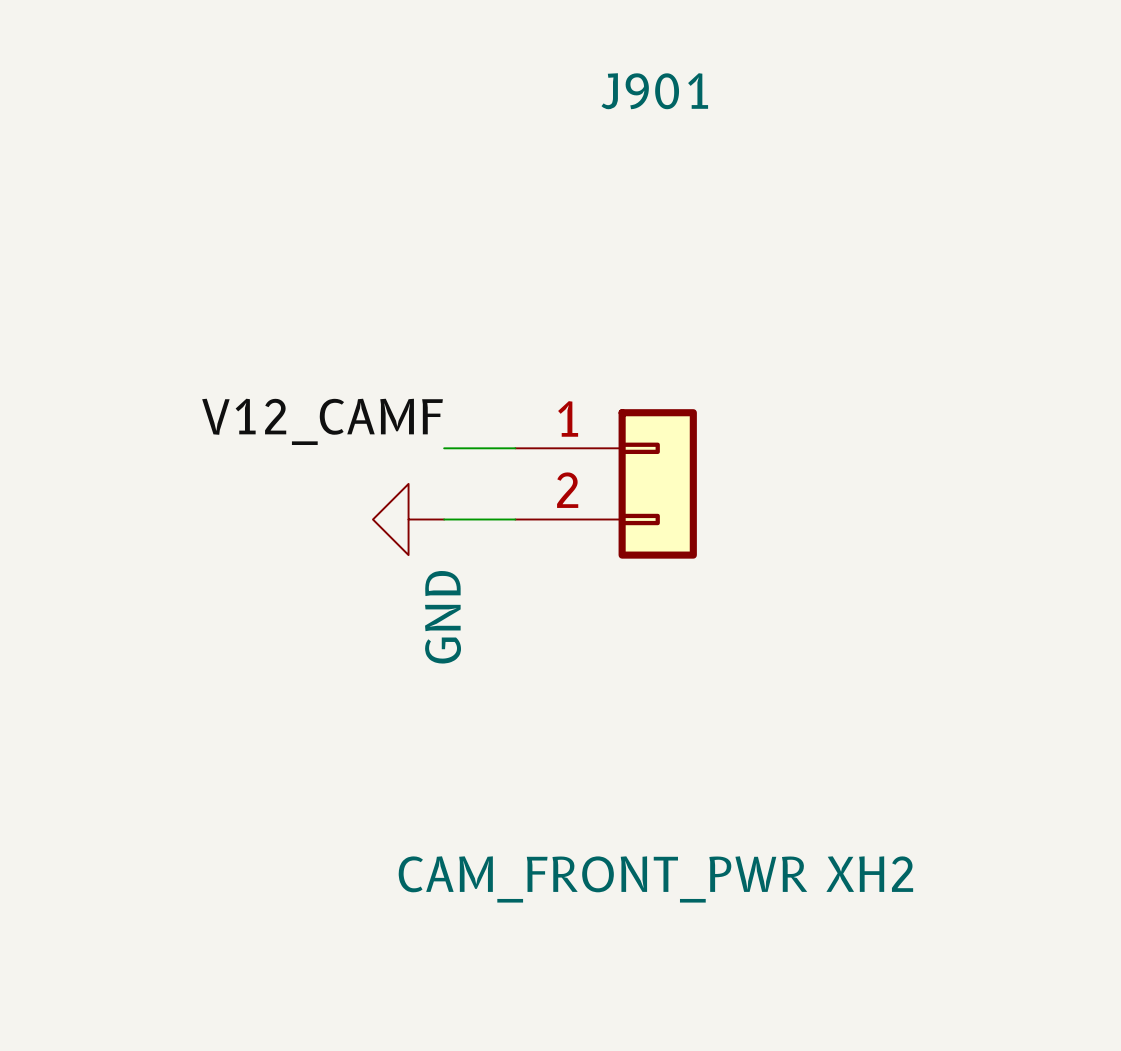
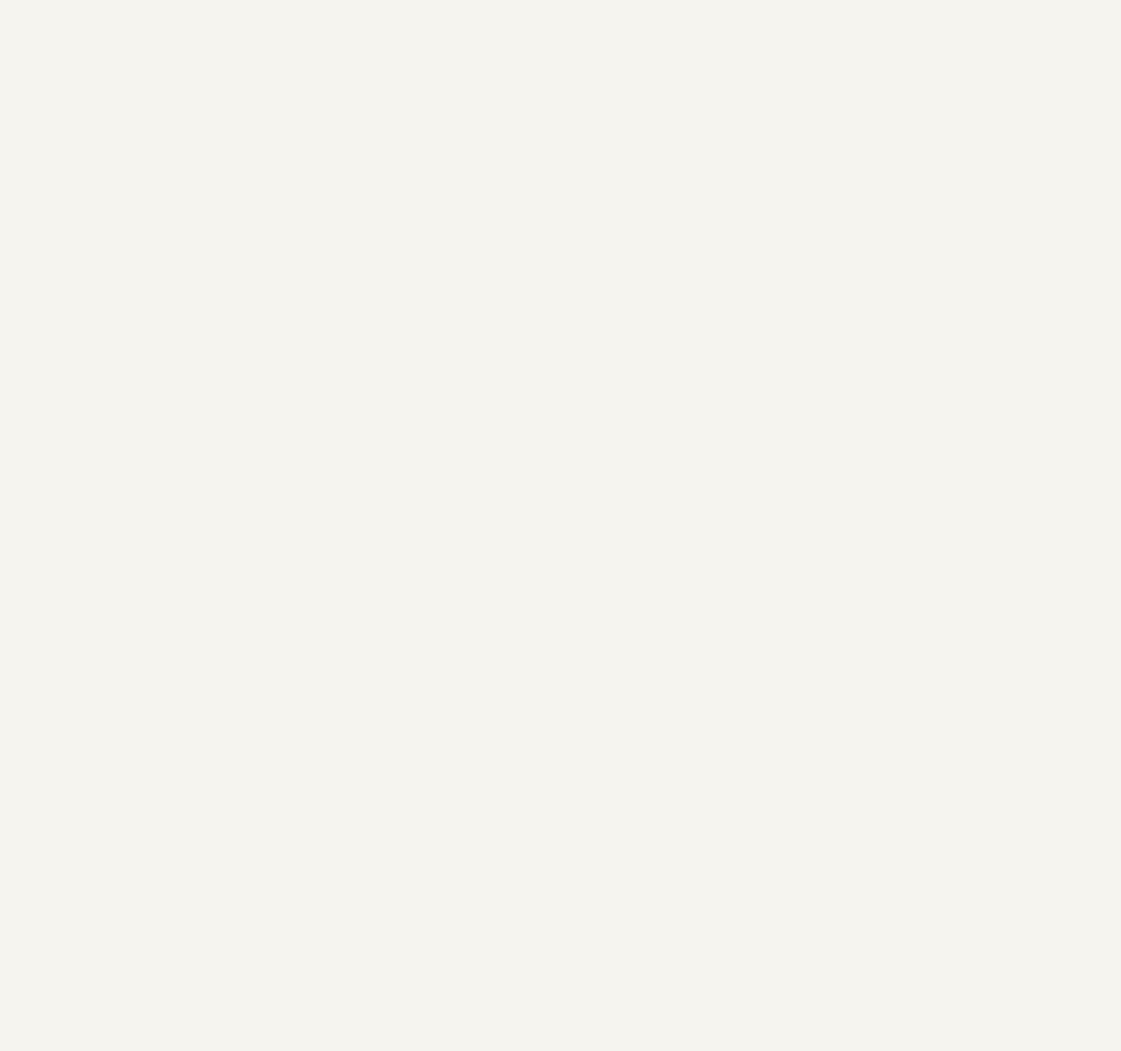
label: V12_CAMF (322, 421) -> none
wire: (444, 448) (515, 448) -> none
J901: CAM_FRONT_PWR XH2 (606, 483) -> none
power symbol: GND (408, 519) -> none
wire: (444, 519) (515, 519) -> none

